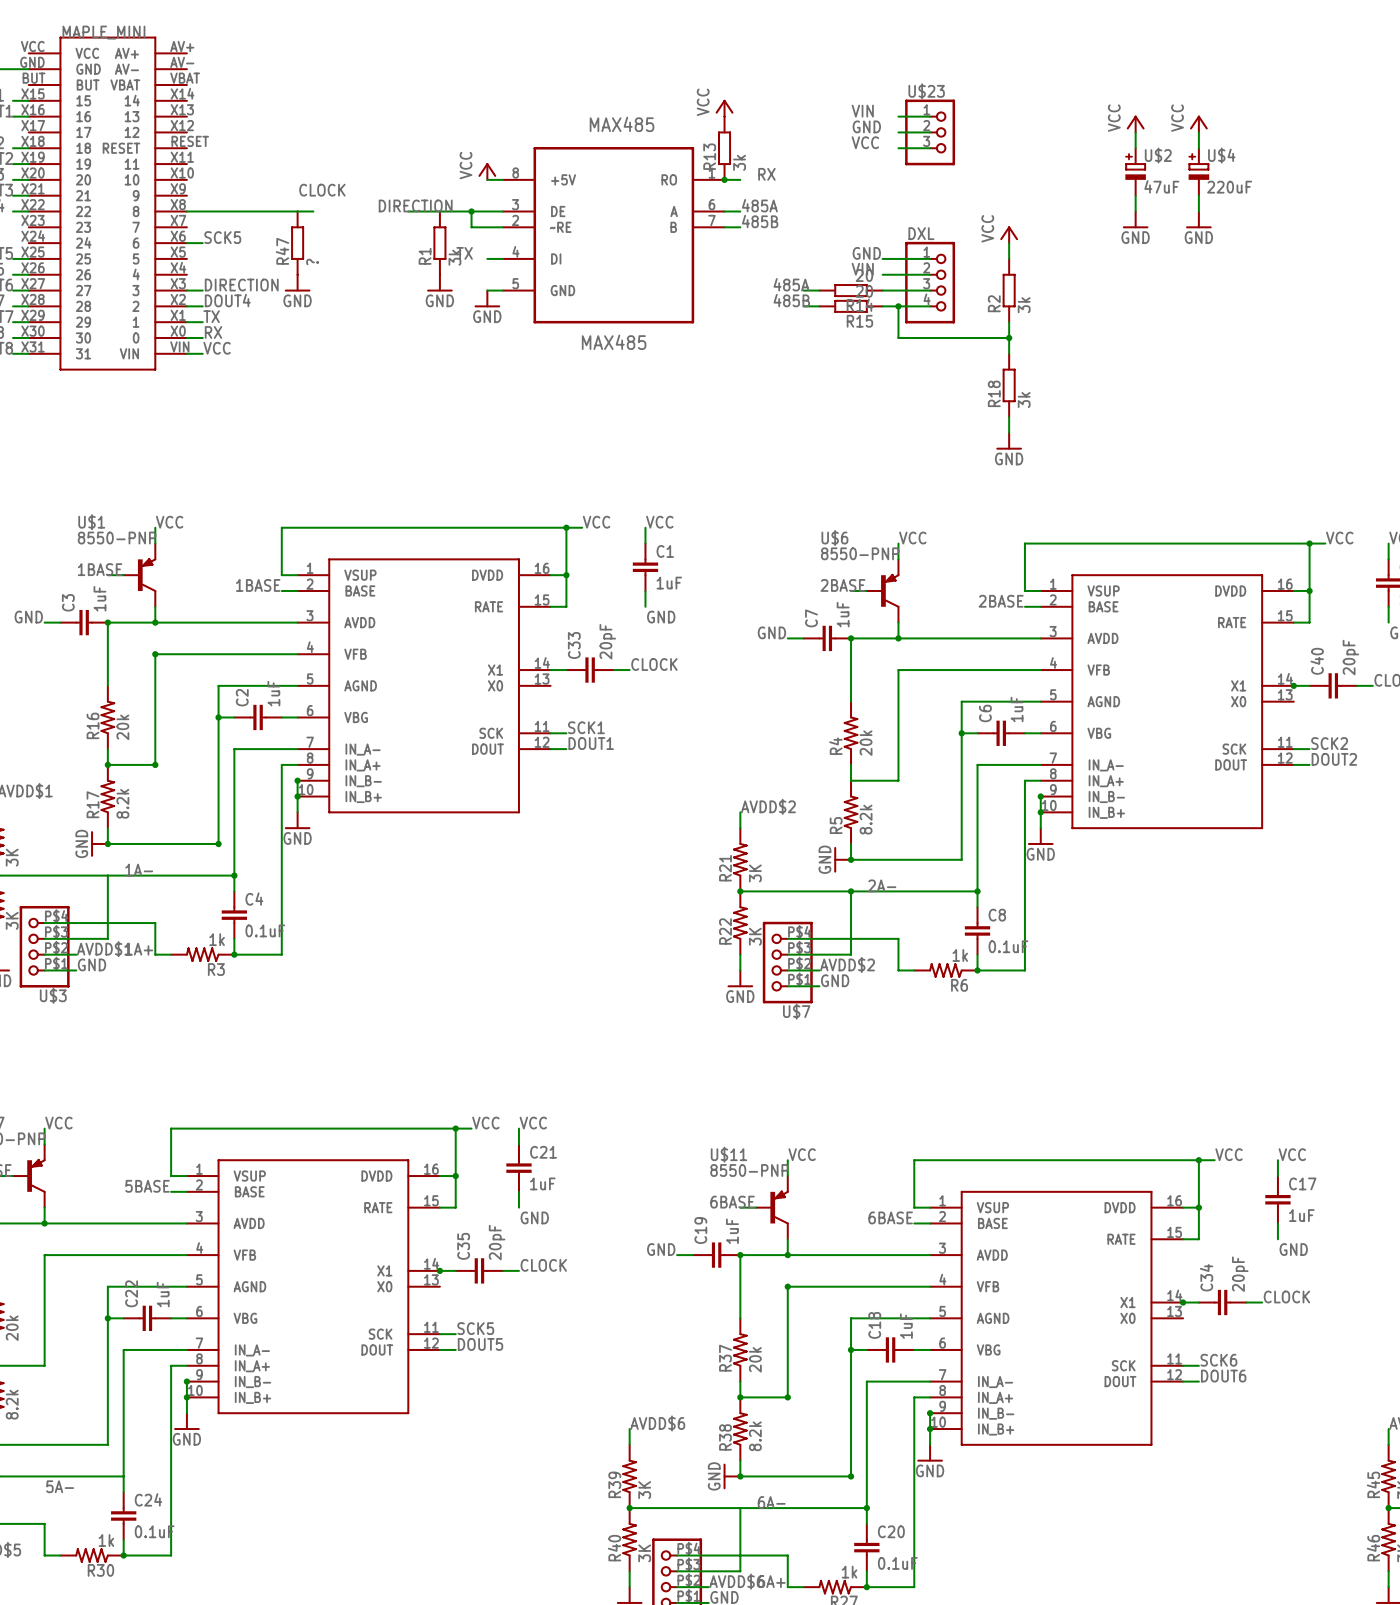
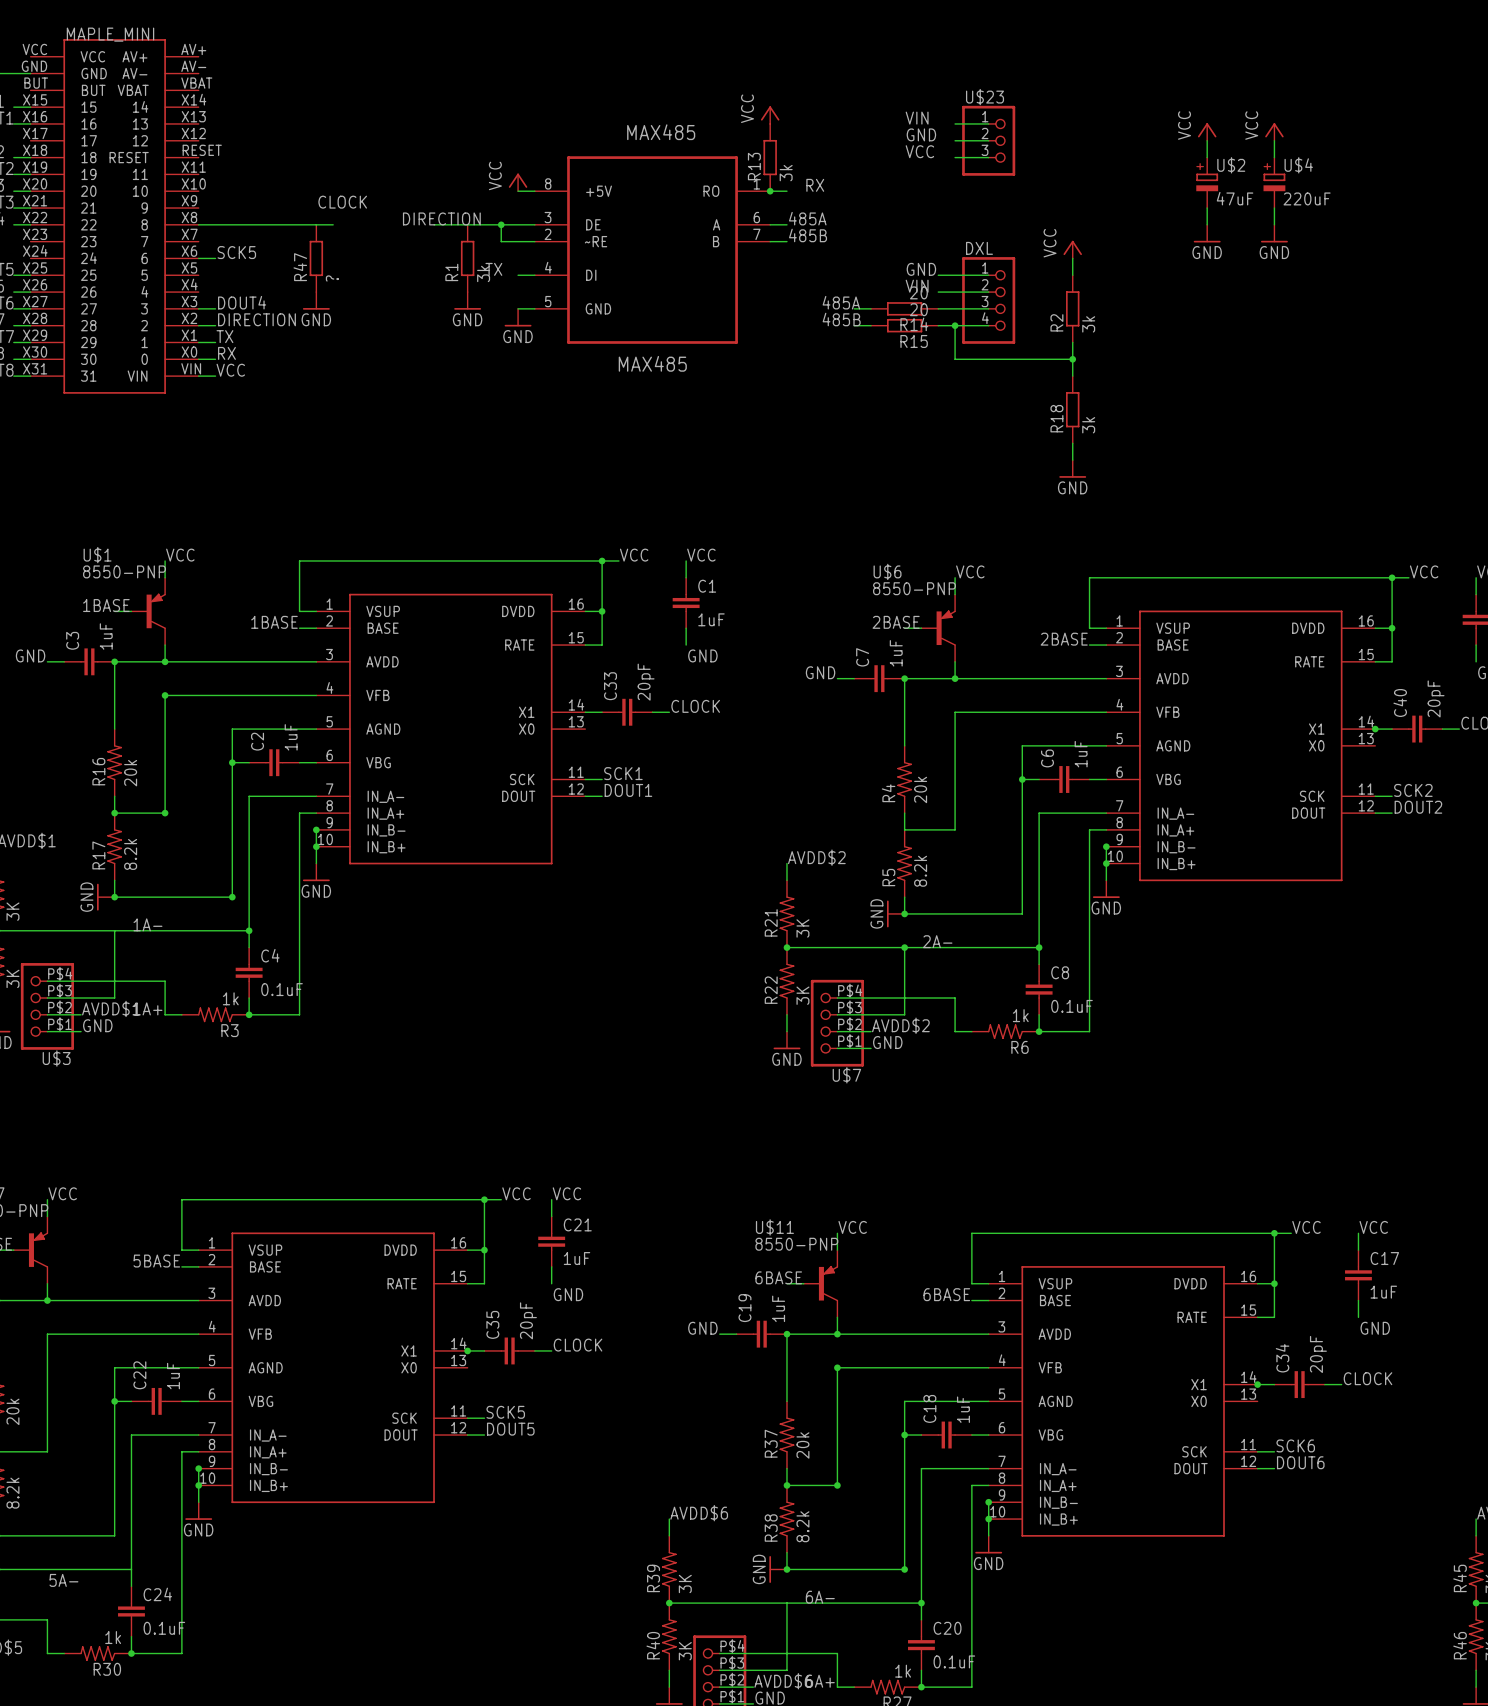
label: DIRECTION (241, 285) -> DOUT4 (242, 302)
label: DOUT4 (227, 300) -> DIRECTION (256, 319)

